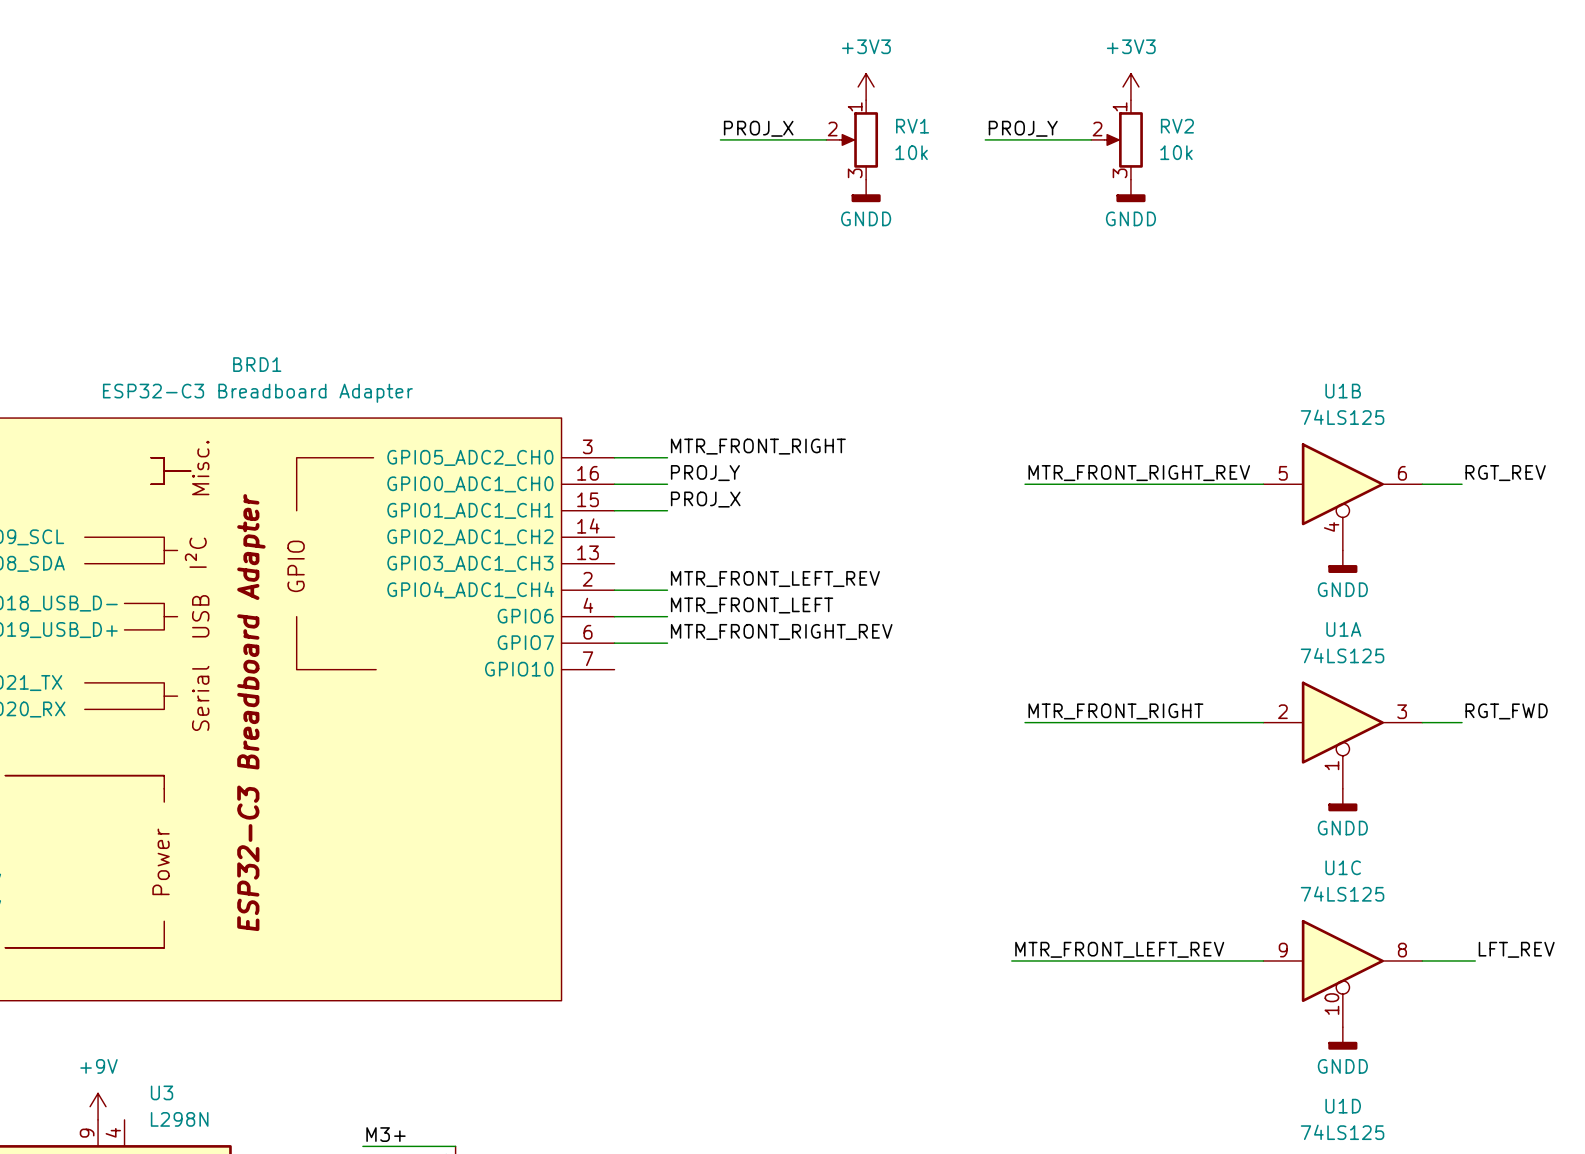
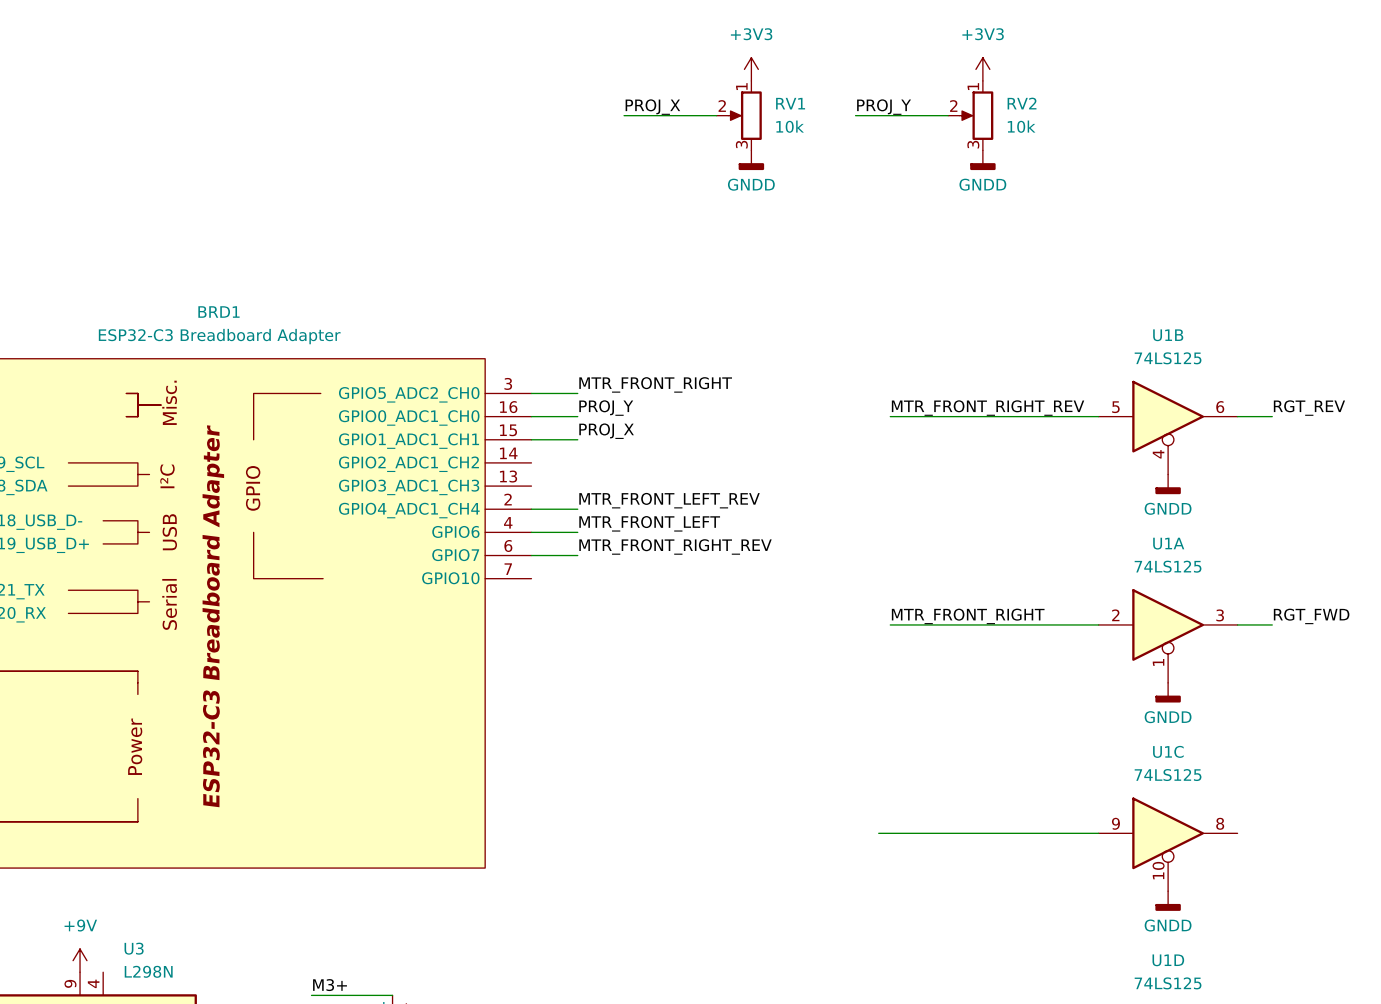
label: MTR_FRONT_LEFT_REV (1119, 949) -> none
label: LFT_REV (1516, 949) -> none
wire: (1422, 960) (1475, 960) -> none

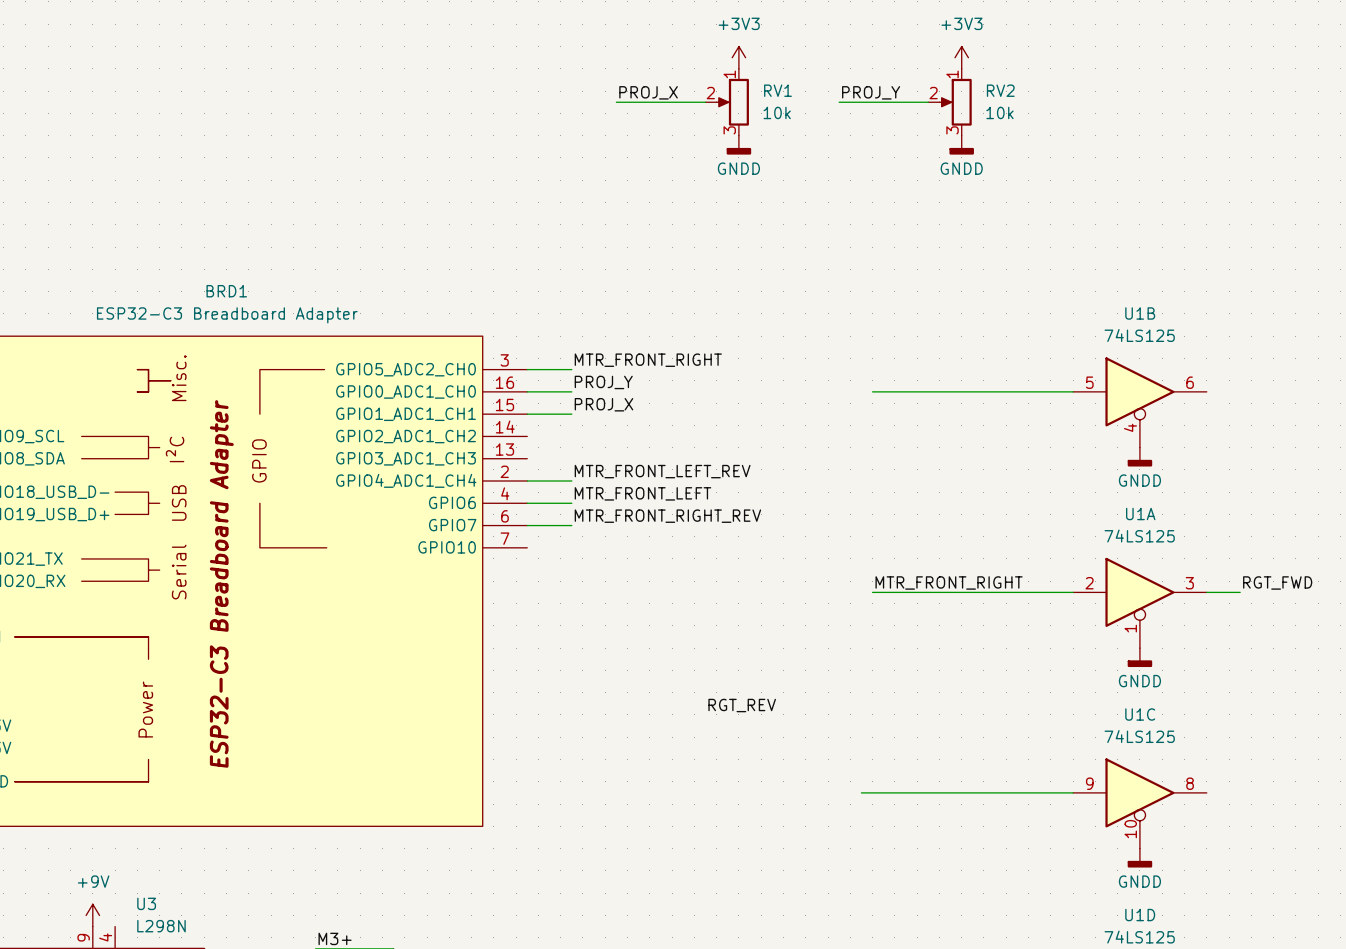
label: MTR_FRONT_RIGHT_REV (988, 408) -> none
label: RGT_REV (1309, 408) -> none
wire: (1237, 416) (1272, 416) -> none
label: none -> RGT_REV (742, 705)

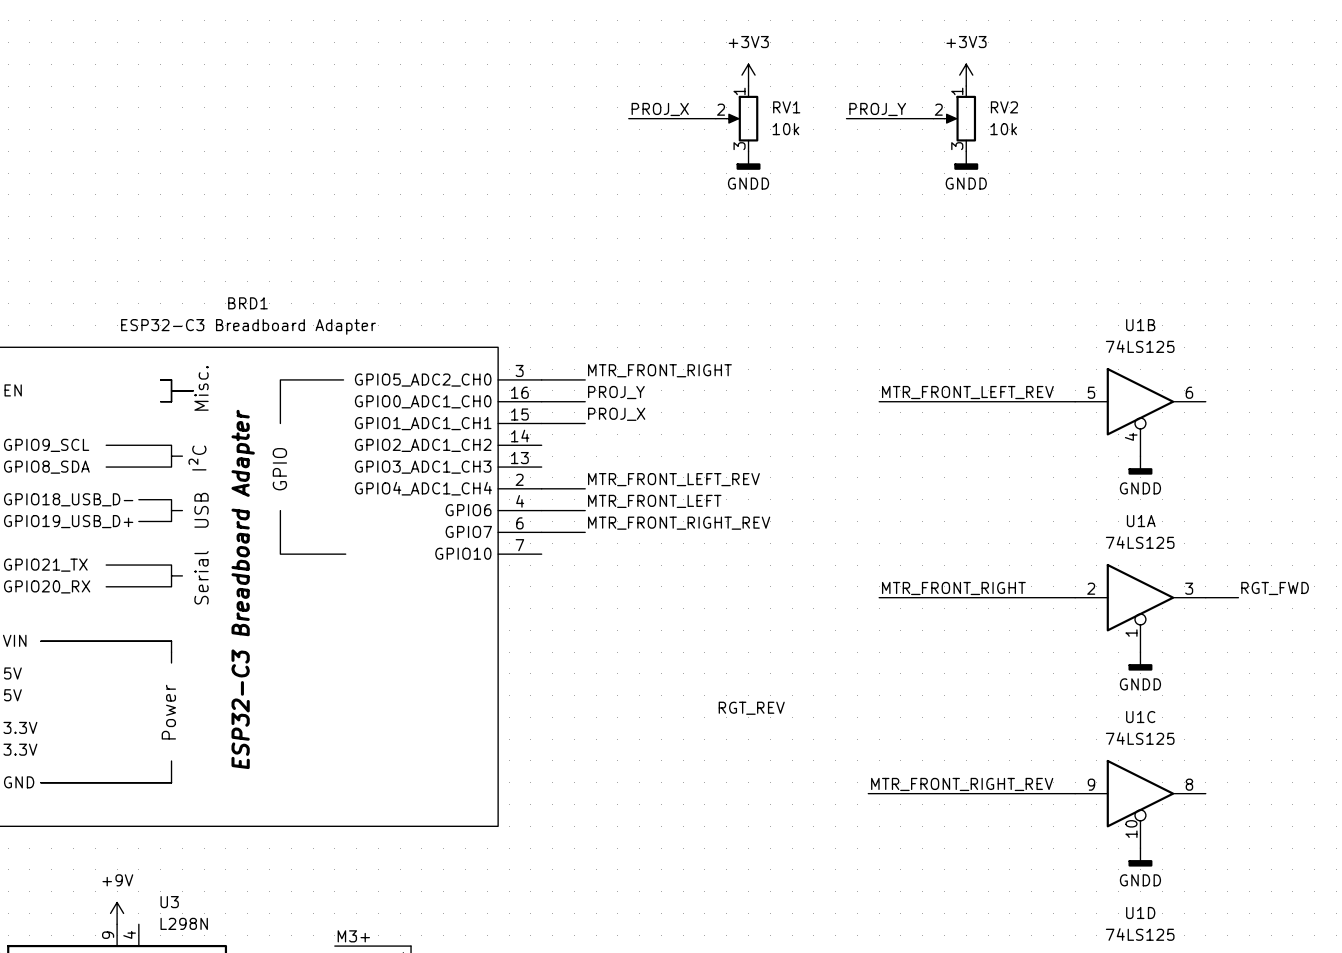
label: none -> MTR_FRONT_LEFT_REV (967, 392)
label: none -> MTR_FRONT_RIGHT_REV (962, 784)

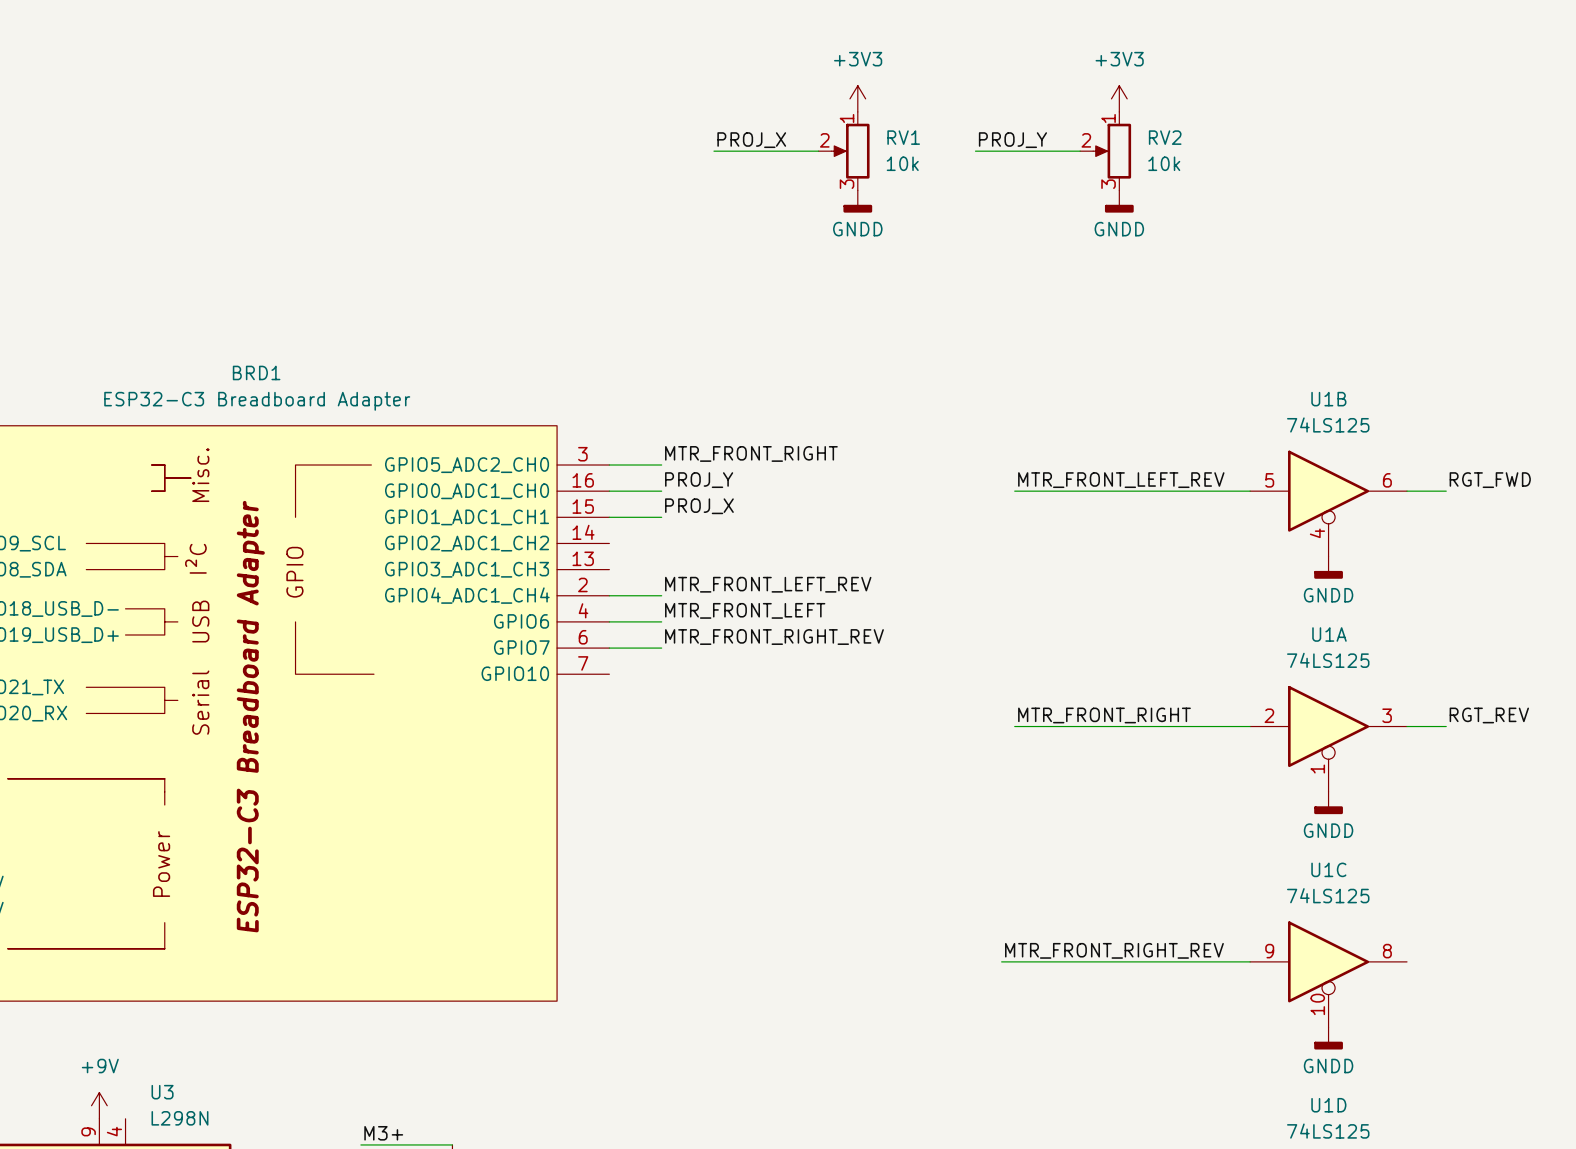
label: none -> RGT_FWD (1490, 480)
wire: none -> (1407, 491) (1446, 491)
label: RGT_FWD (1275, 588) -> RGT_REV (1489, 715)
label: RGT_REV (751, 708) -> none

